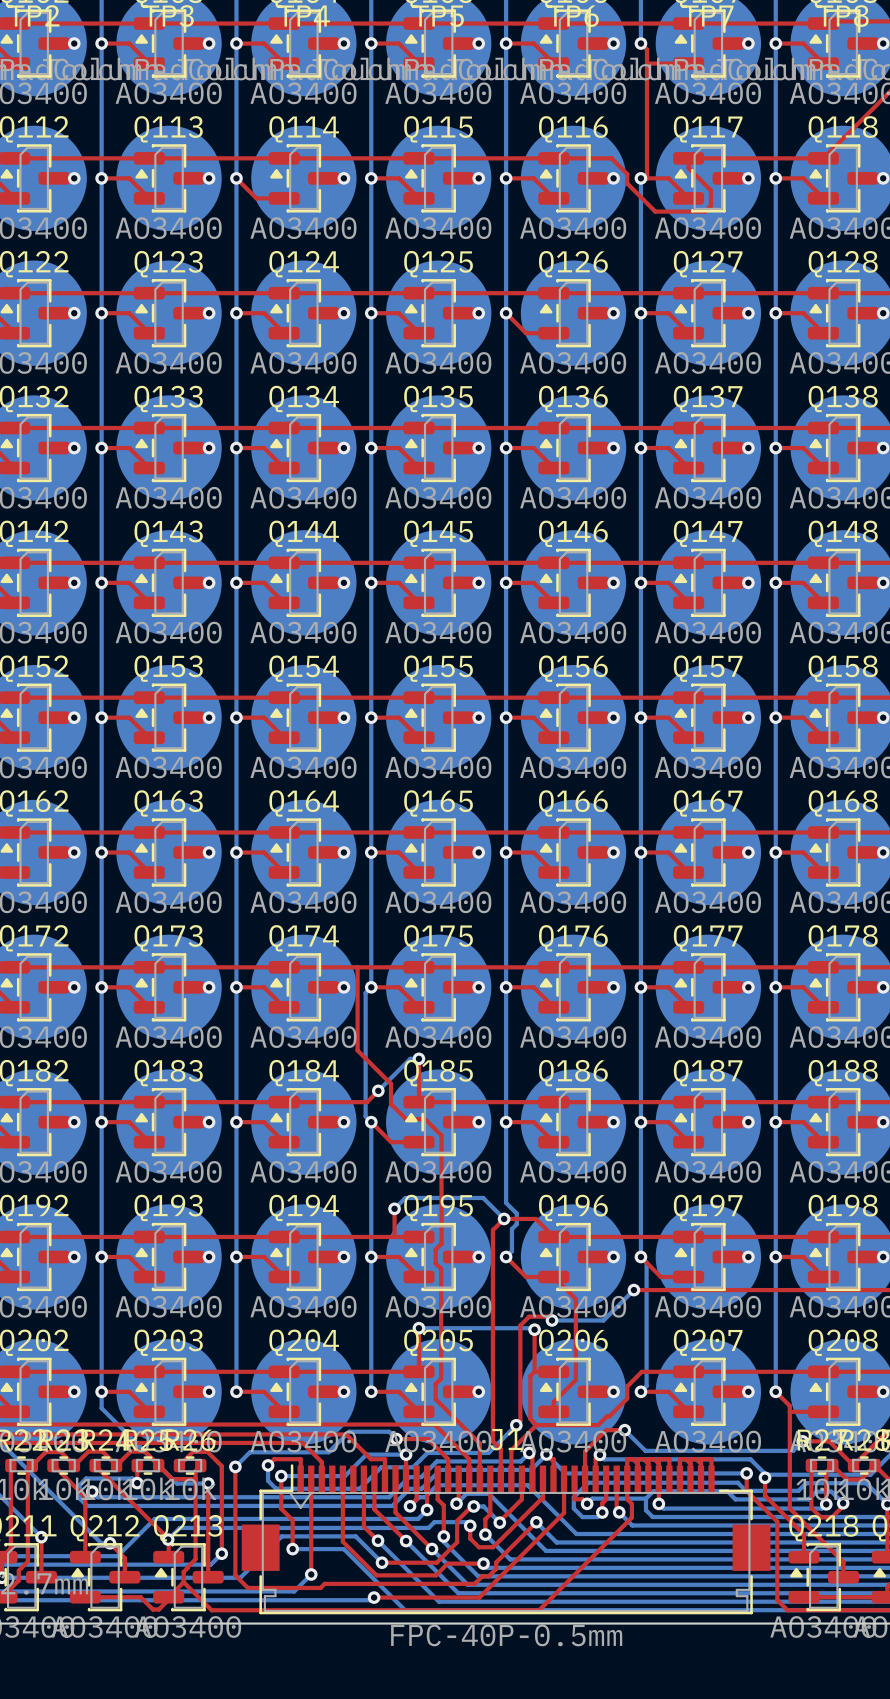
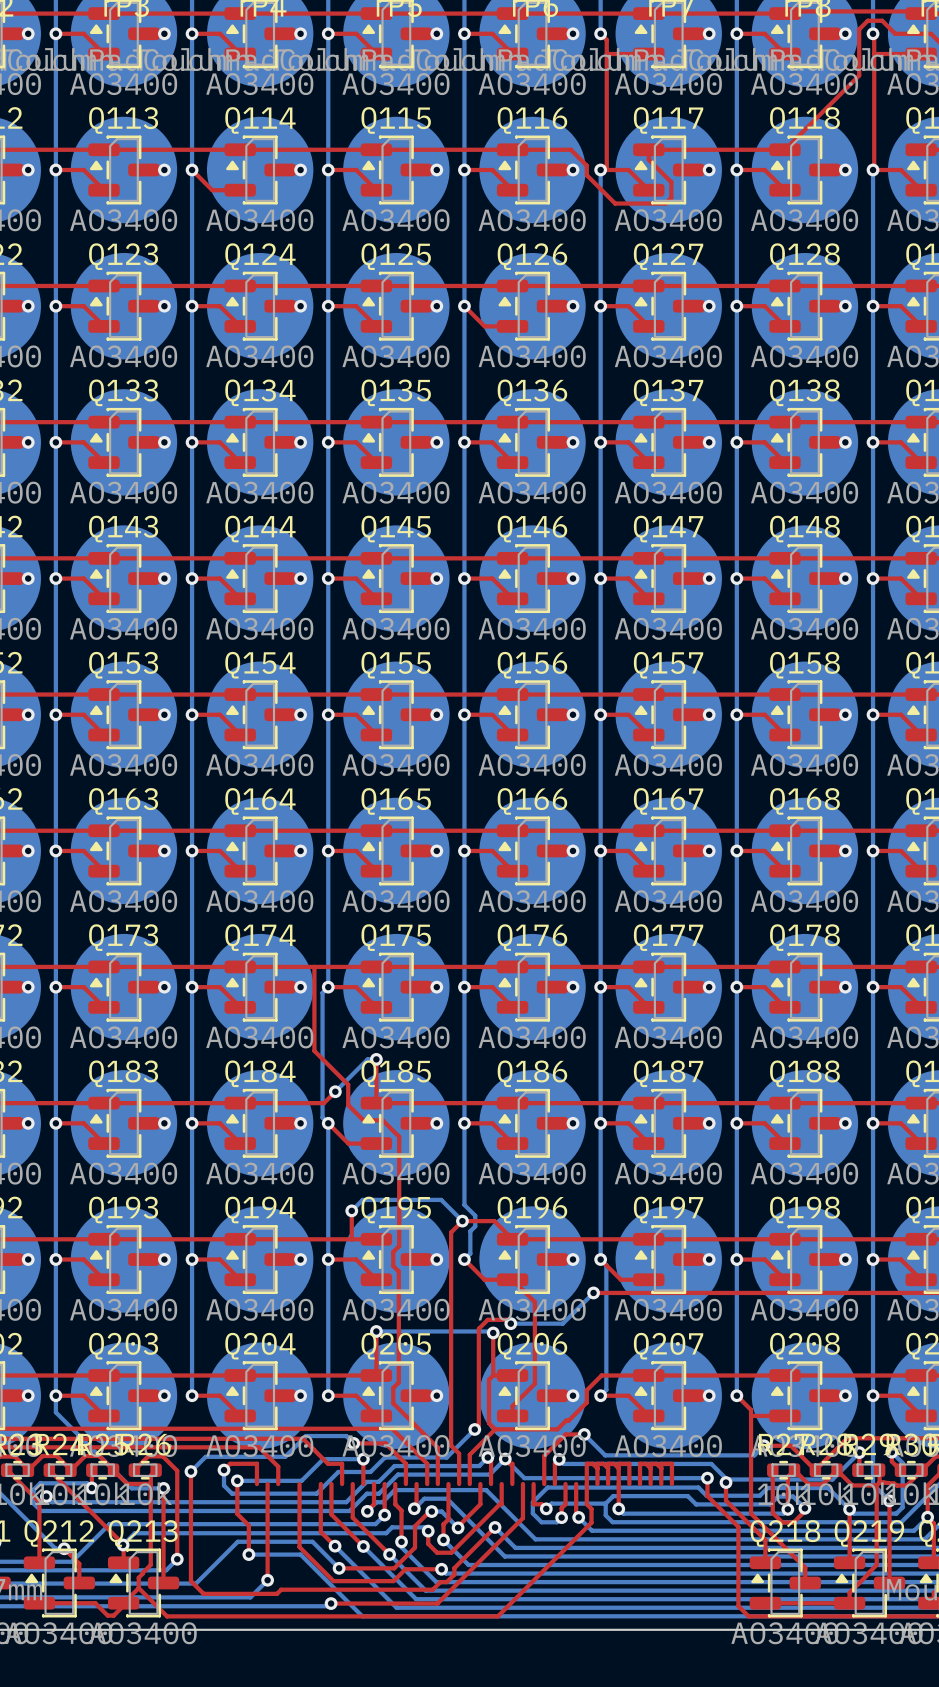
J1: FPC-40P-0.5mm (506, 1539) -> none

